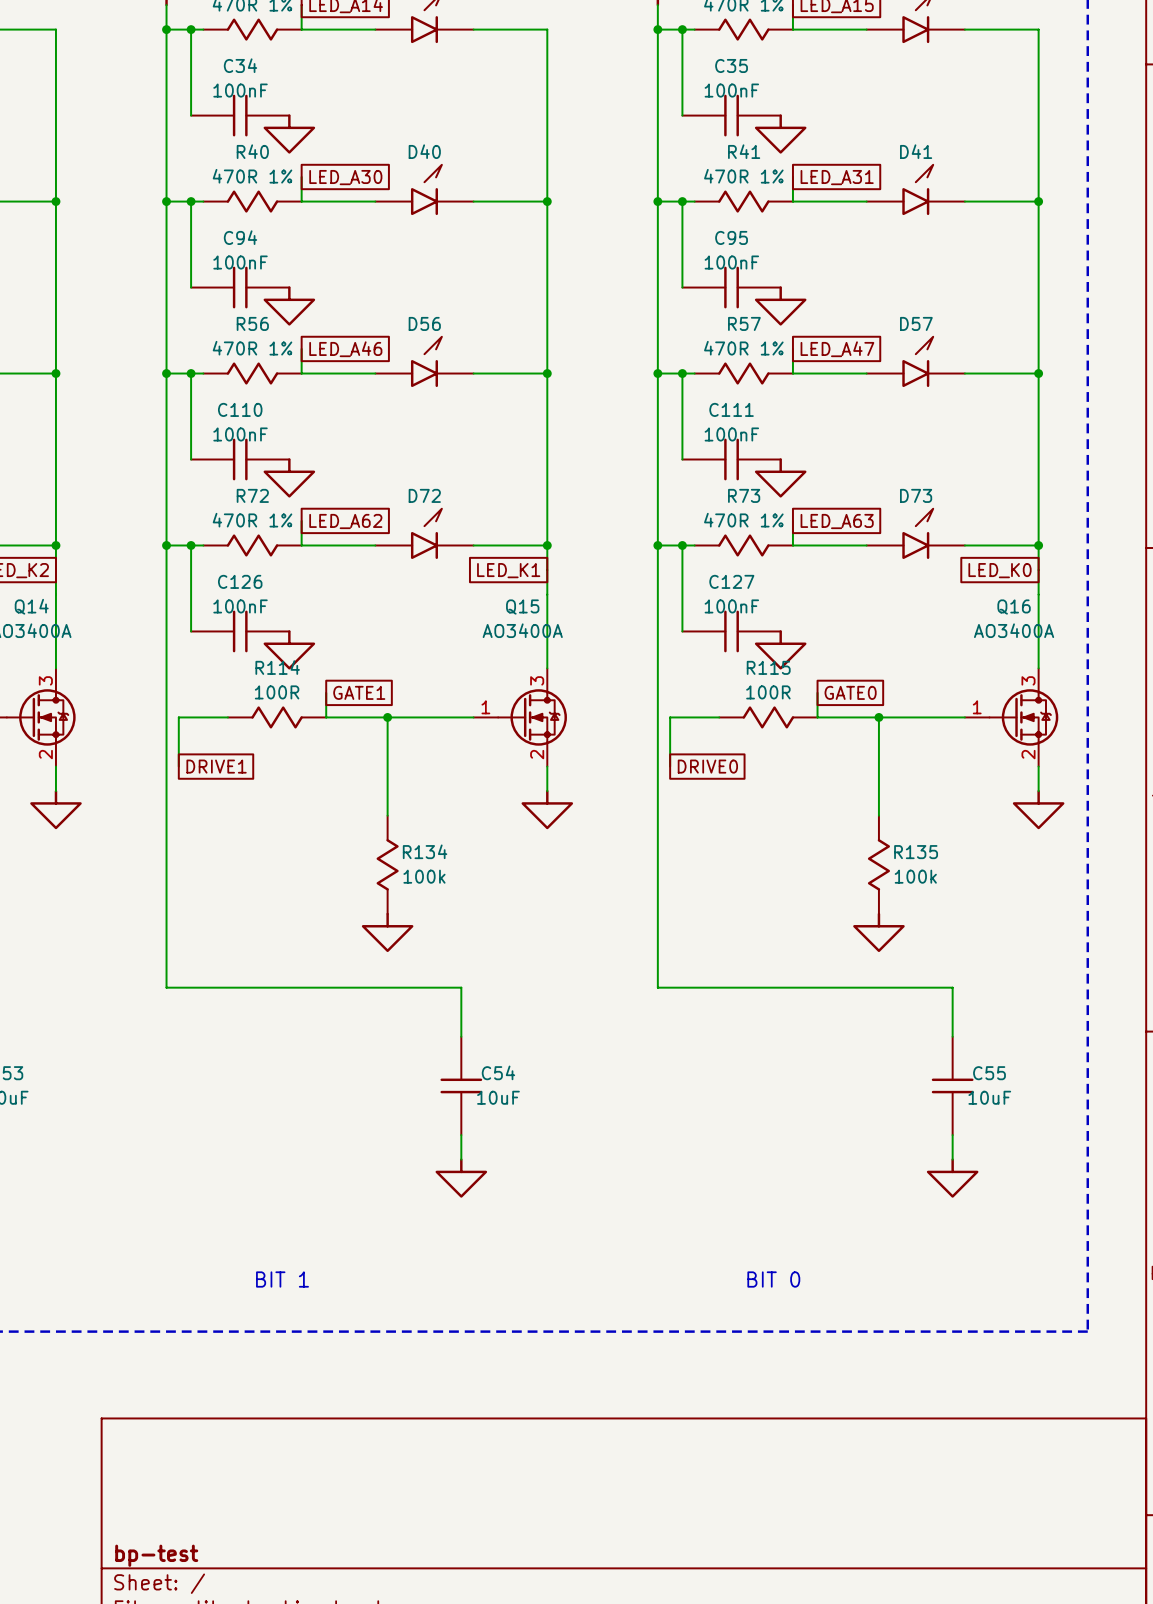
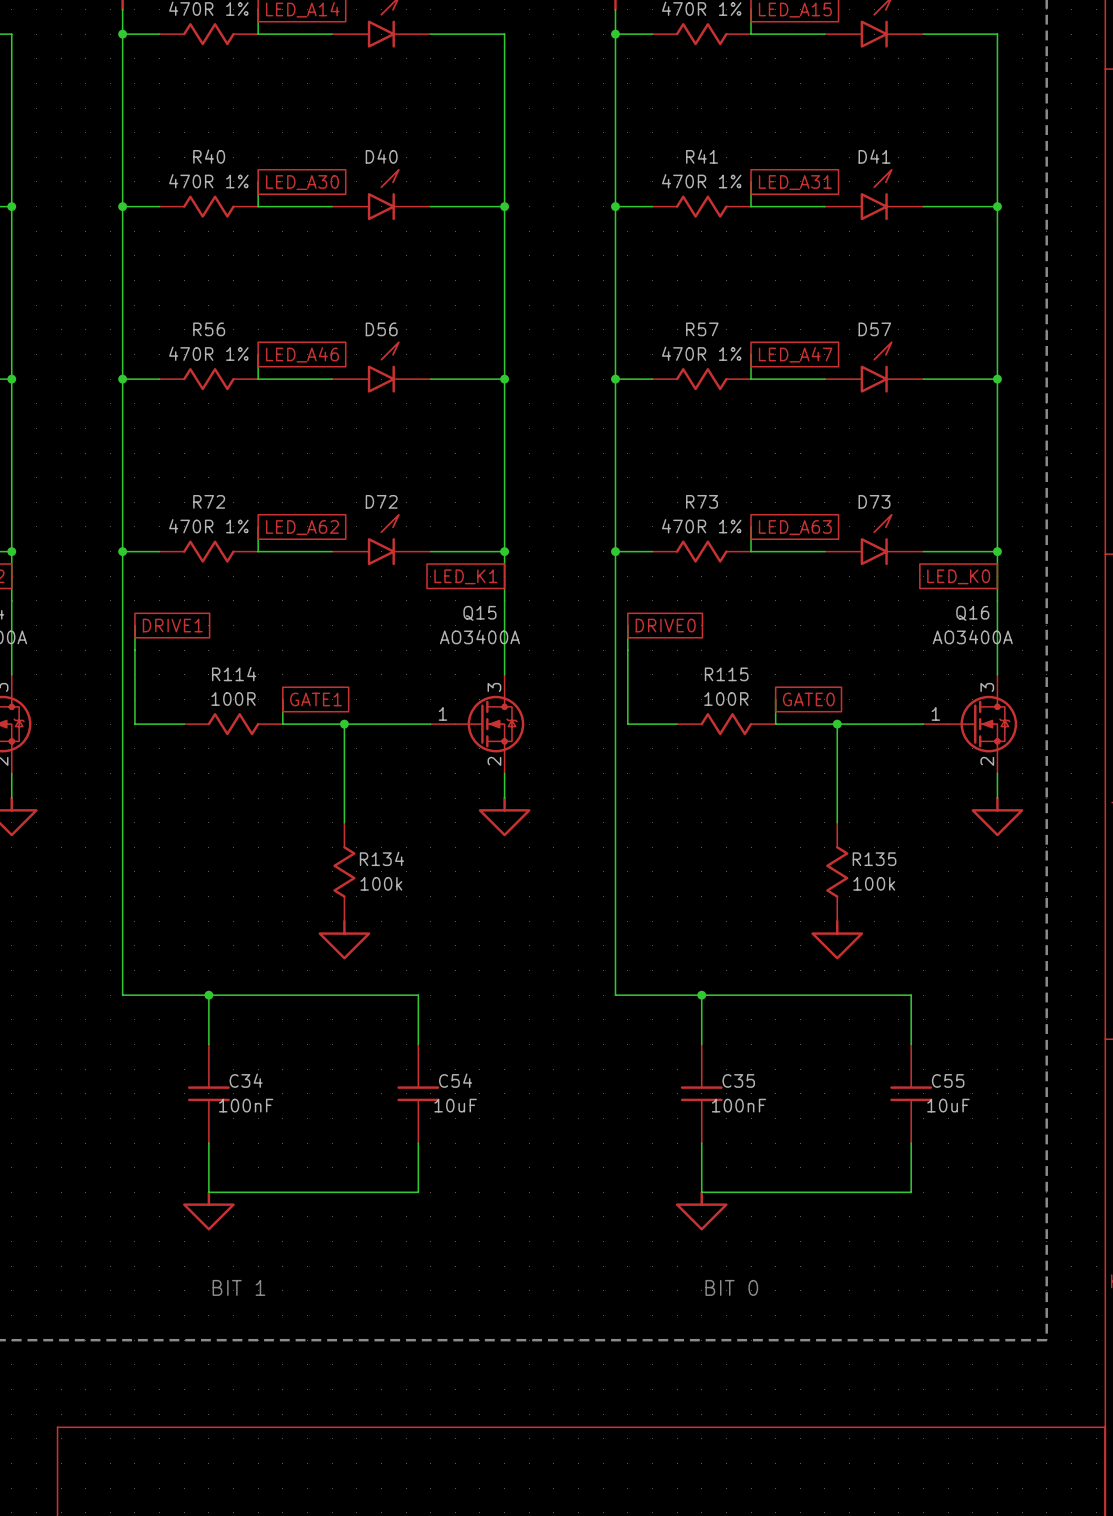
wire: (191, 29) (191, 115) -> none
junction: (191, 29) -> none
wire: (682, 29) (682, 115) -> none
junction: (682, 29) -> none
C34 rotation: 0° (240, 115) -> 90° clockwise (208, 1093)
C34 position: (240, 115) -> (208, 1093)
C35 rotation: 0° (731, 115) -> 90° clockwise (701, 1093)
C35 position: (731, 115) -> (701, 1093)
power symbol: (289, 134) -> none
power symbol: (780, 134) -> none
wire: (191, 201) (191, 287) -> none
junction: (191, 201) -> none
wire: (682, 201) (682, 287) -> none
junction: (682, 201) -> none
C94: 100nF (240, 287) -> none
C95: 100nF (731, 287) -> none
power symbol: (289, 305) -> none
power symbol: (780, 305) -> none
wire: (191, 373) (191, 459) -> none
junction: (191, 373) -> none
wire: (682, 373) (682, 459) -> none
junction: (682, 373) -> none
C110: 100nF (240, 459) -> none
C111: 100nF (731, 459) -> none
power symbol: (289, 477) -> none
power symbol: (780, 477) -> none
wire: (191, 545) (191, 631) -> none
junction: (191, 545) -> none
wire: (682, 545) (682, 631) -> none
junction: (682, 545) -> none
C126: 100nF (240, 631) -> none
C127: 100nF (731, 631) -> none
power symbol: (289, 649) -> none
power symbol: (780, 649) -> none
wire: (178, 717) (178, 766) -> (134, 724) (134, 625)
wire: (670, 717) (670, 766) -> (627, 724) (627, 625)
global label position: DRIVE1 (216, 766) -> DRIVE1 (172, 625)
global label position: DRIVE0 (707, 766) -> DRIVE0 (665, 625)
wire: none -> (208, 995) (208, 1044)
junction: none -> (208, 995)
wire: none -> (701, 995) (701, 1044)
junction: none -> (701, 995)
wire: none -> (208, 1143) (208, 1192) (418, 1192) (418, 1167)
wire: none -> (701, 1143) (701, 1192) (911, 1192) (911, 1167)
power symbol: (461, 1178) -> none
power symbol: (952, 1178) -> none
power symbol: none -> (208, 1210)
power symbol: none -> (701, 1210)

